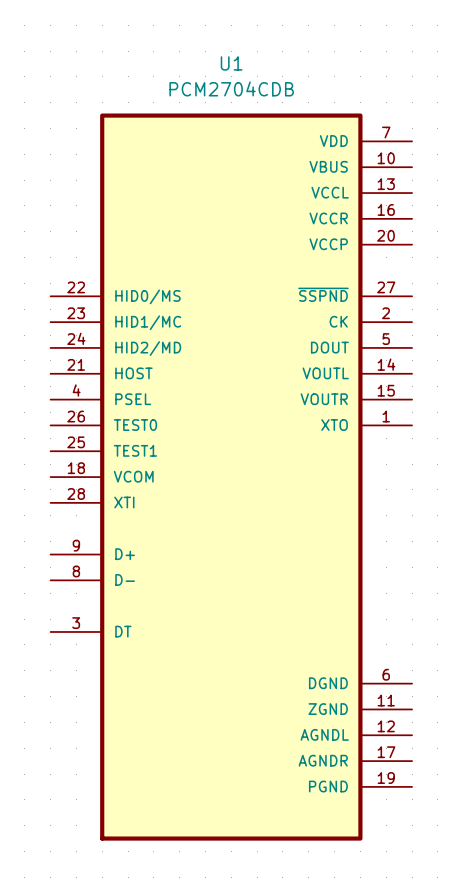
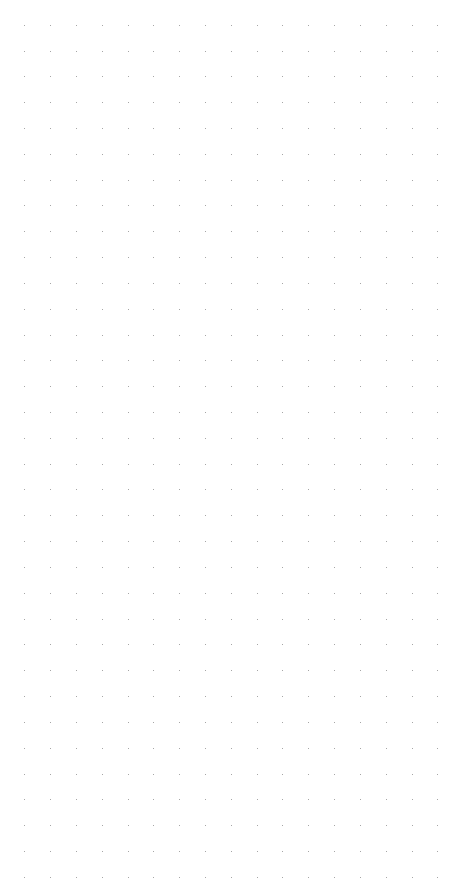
U1: PCM2704CDB (231, 477) -> none

